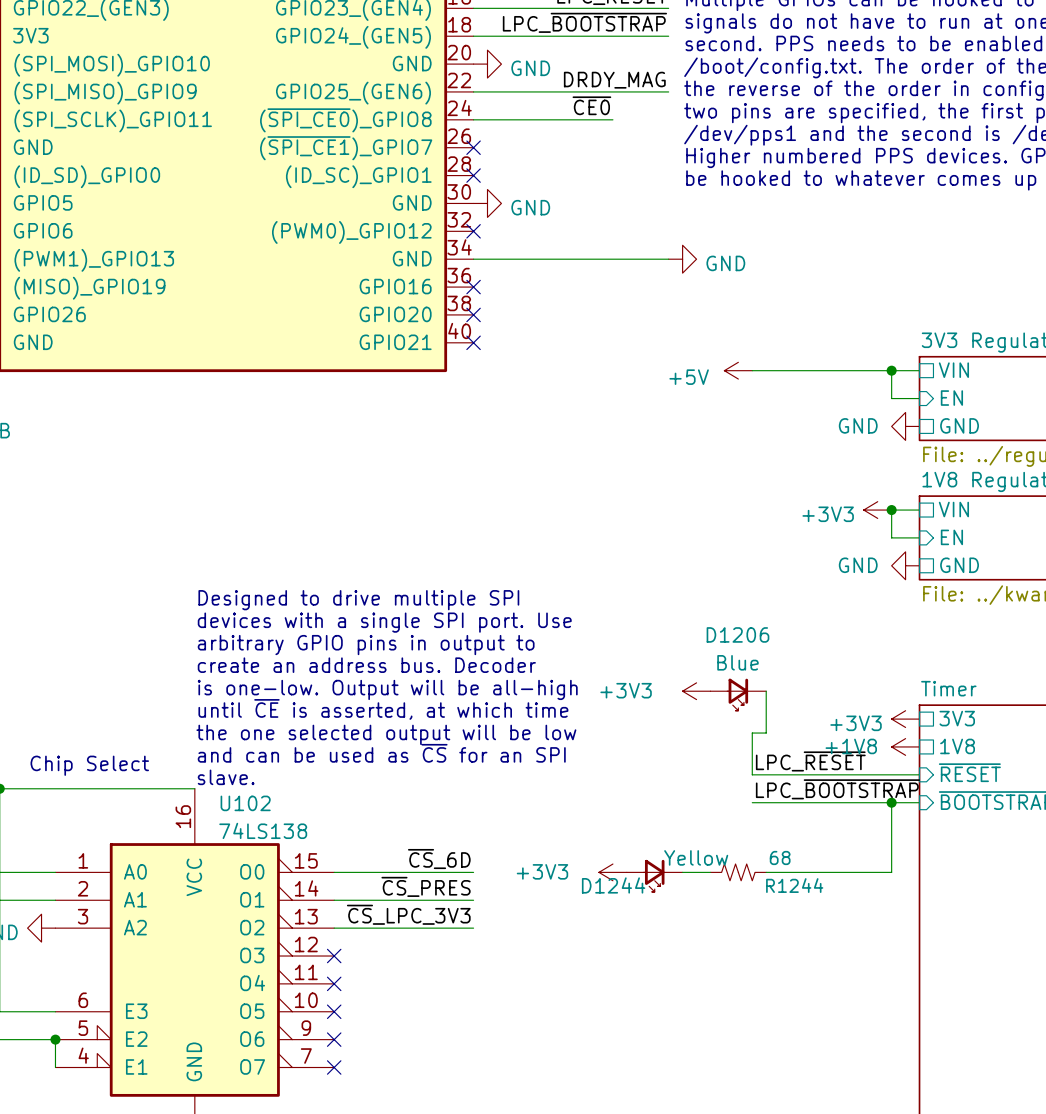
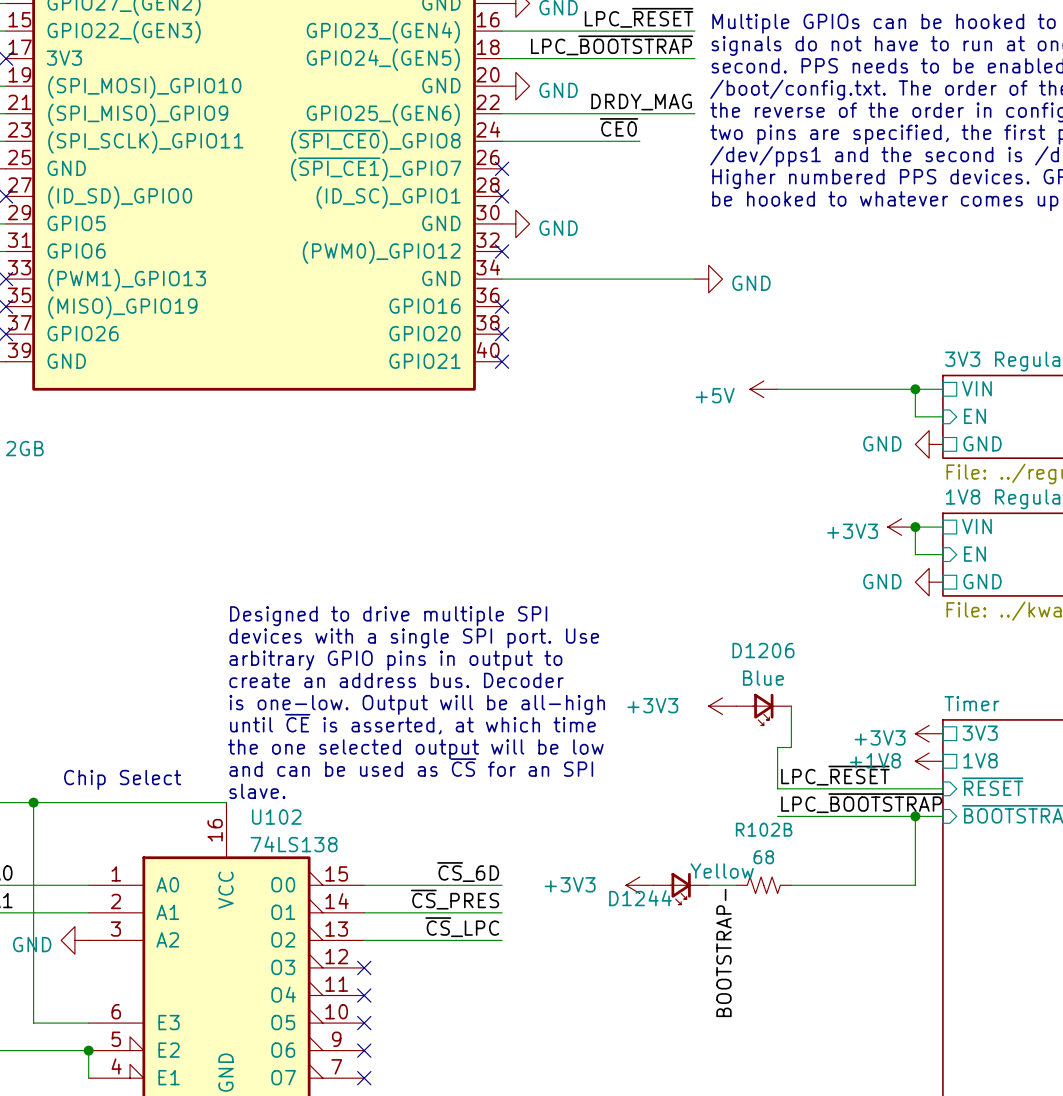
R1244 value position: 68 (780, 857) -> 68 (763, 857)
R1244 name: R1244 (794, 885) -> R102B (764, 829)
label: ~{CS}_LPC_3V3 (408, 914) -> ~{CS}_LPC (462, 927)
label: none -> BOOTSTRAP- (723, 952)

